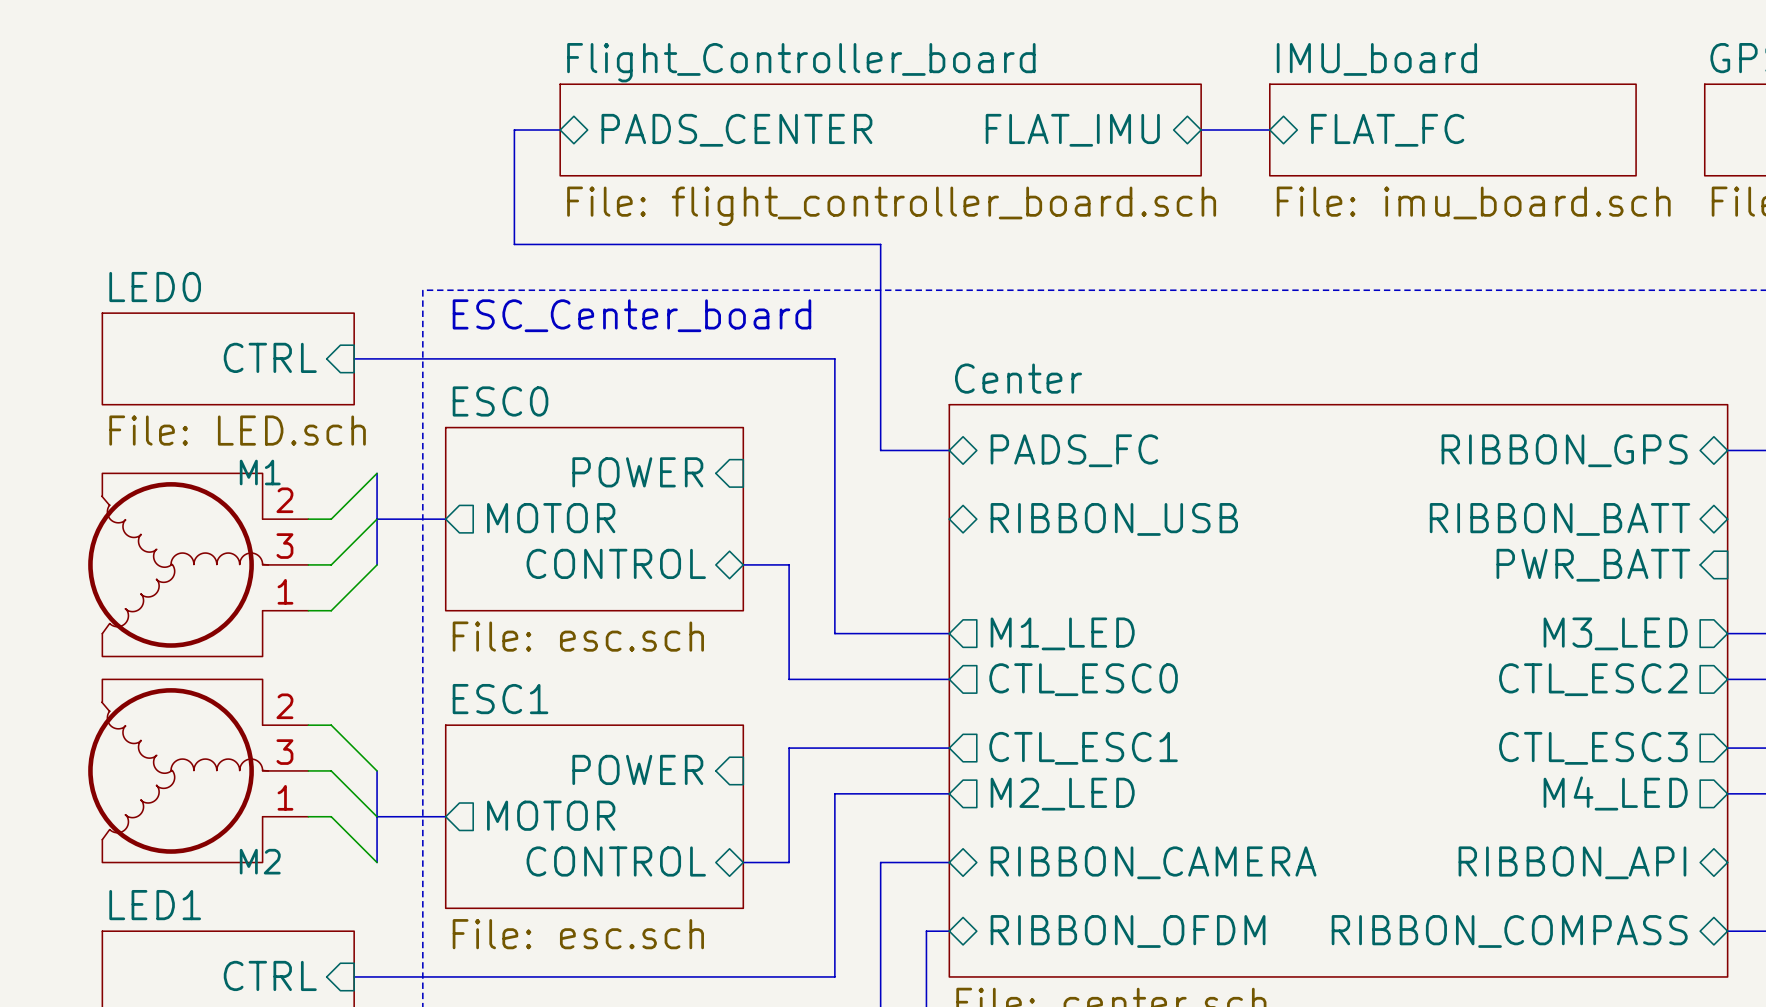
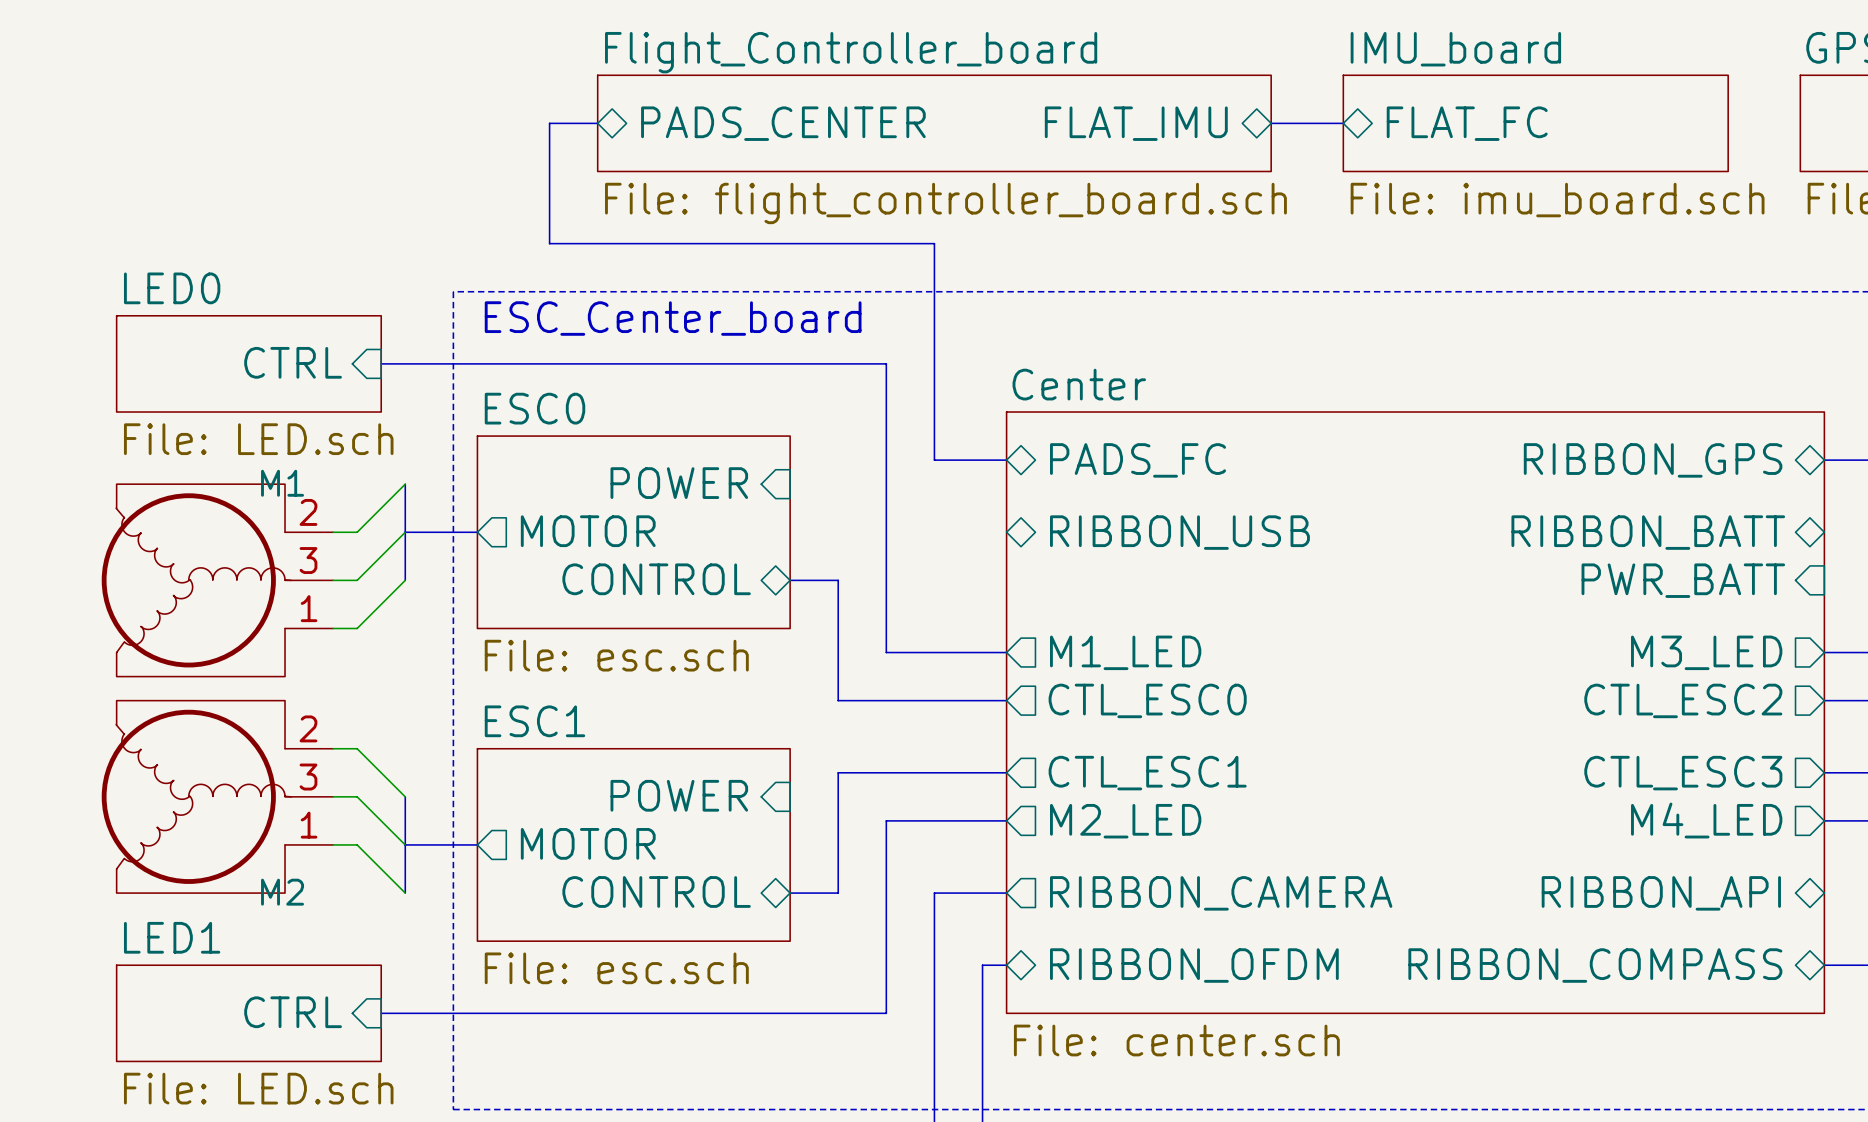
sheet pin shape: bidirectional (1153, 862) -> output (1221, 893)

